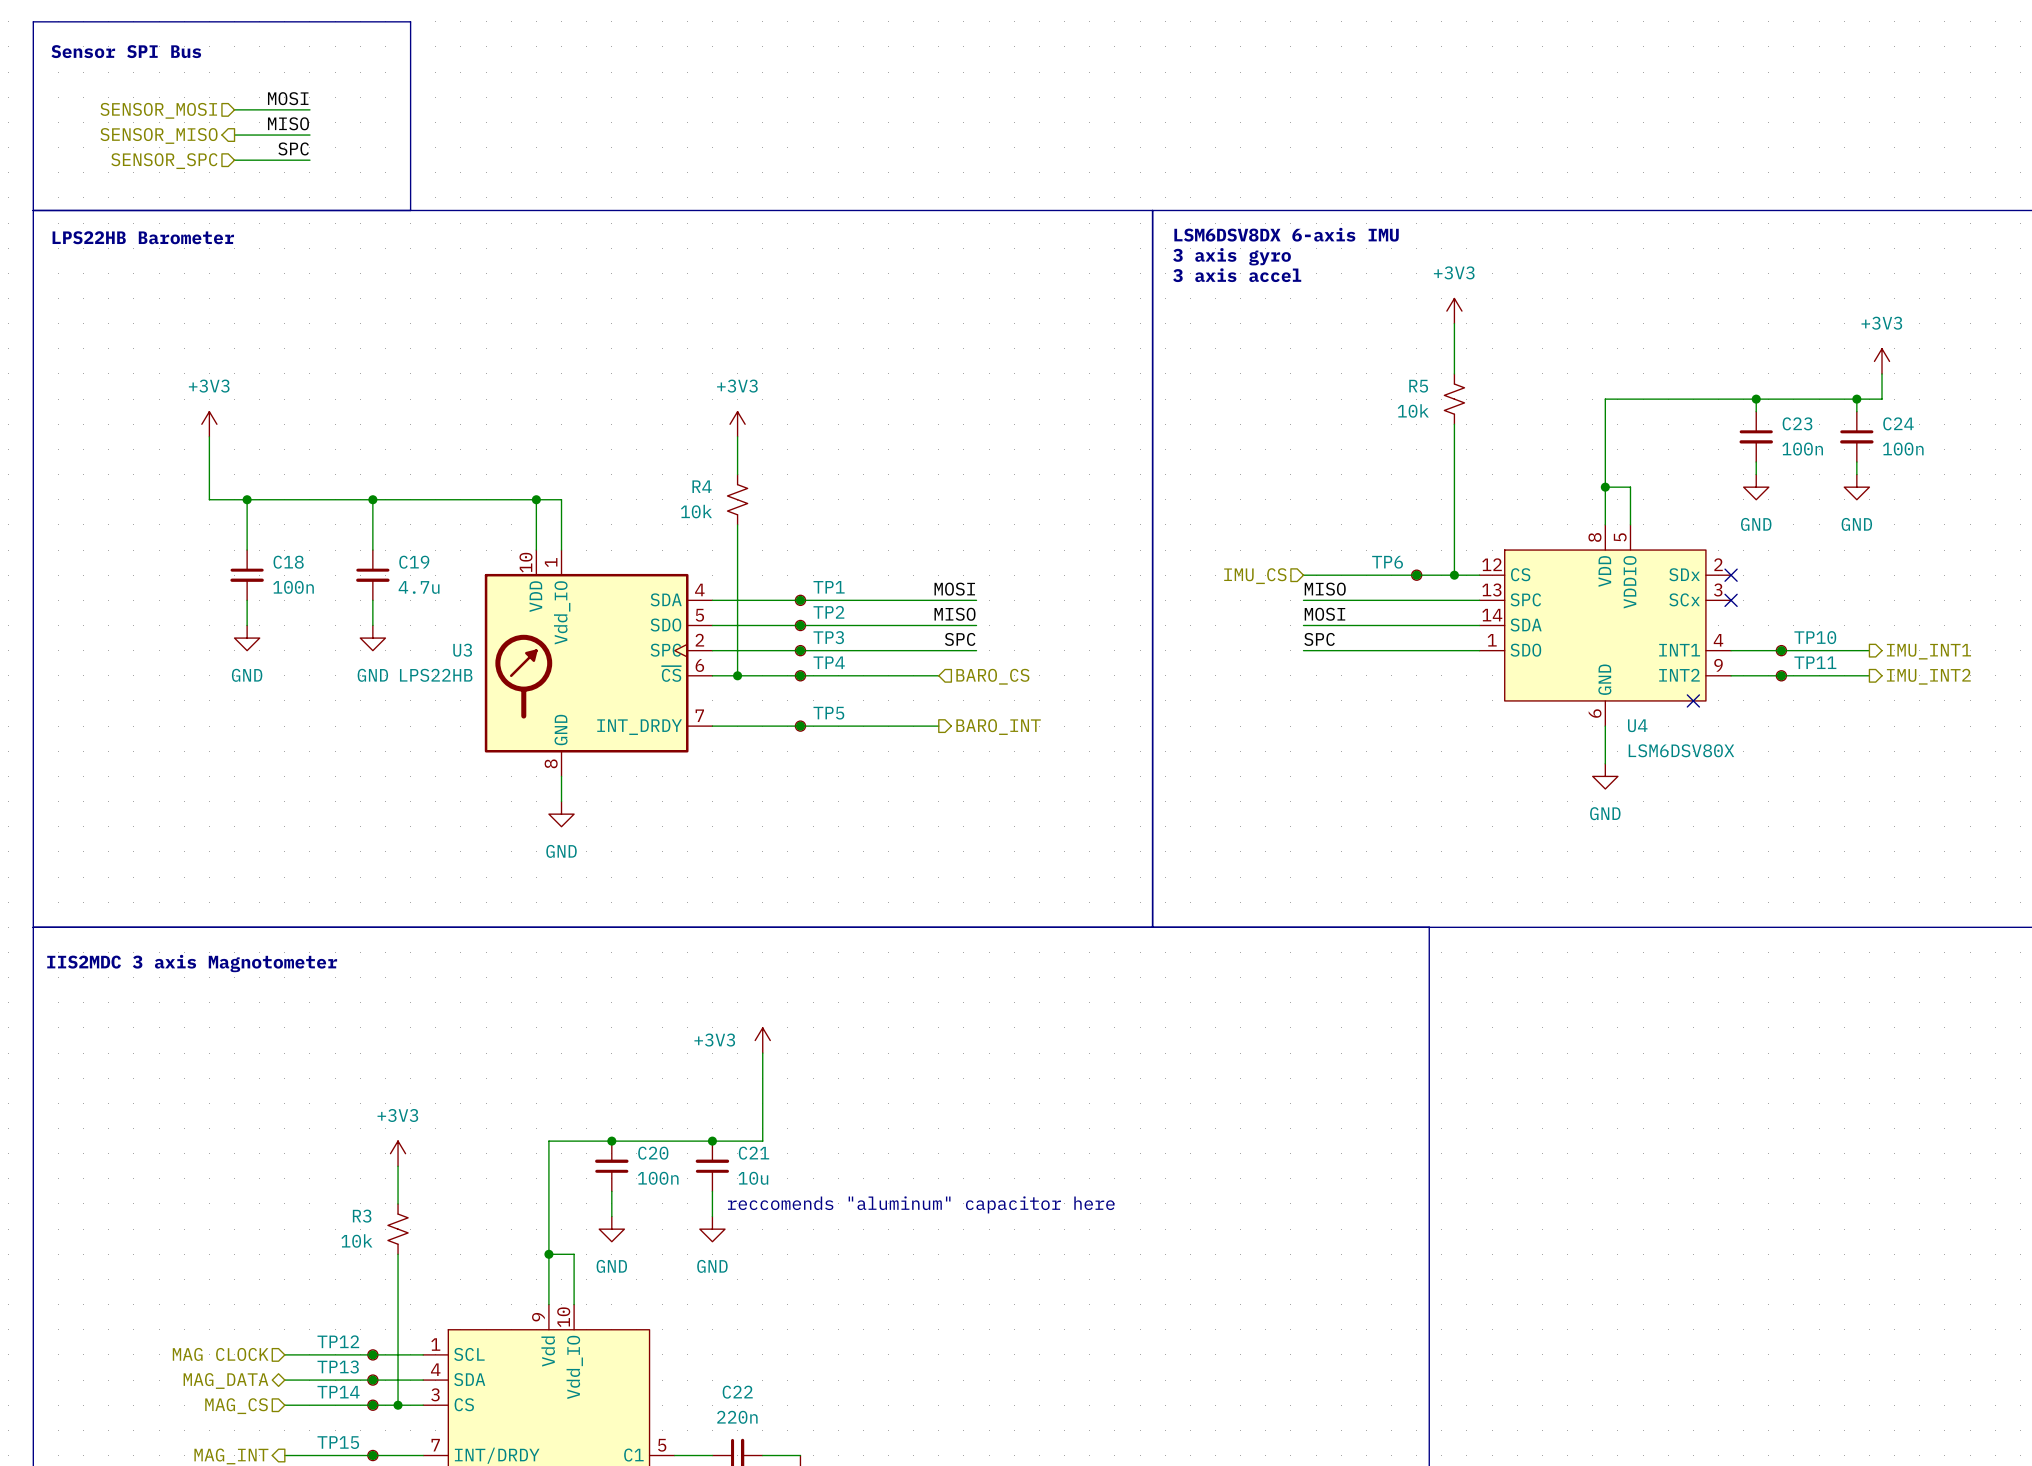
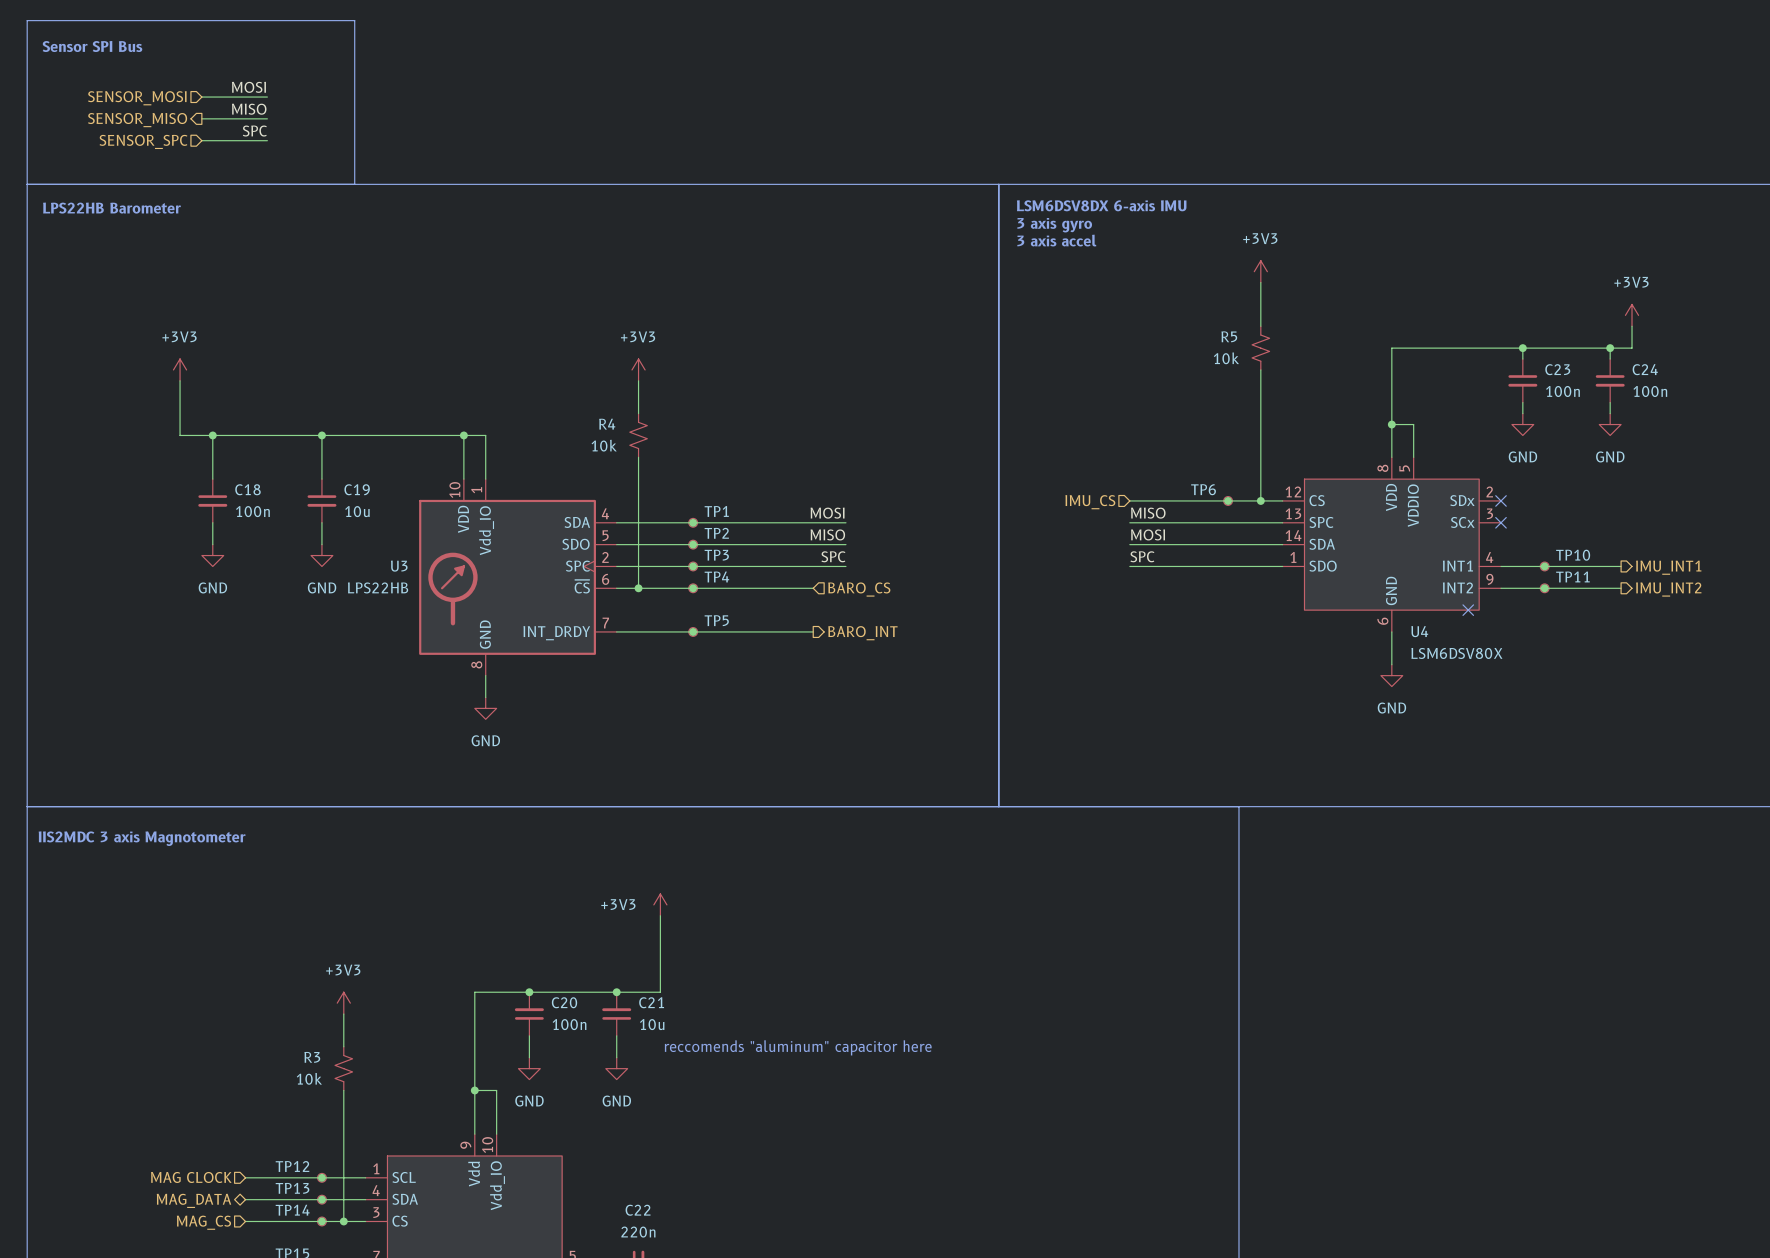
C19 value: 4.7u (419, 587) -> 10u (357, 511)

